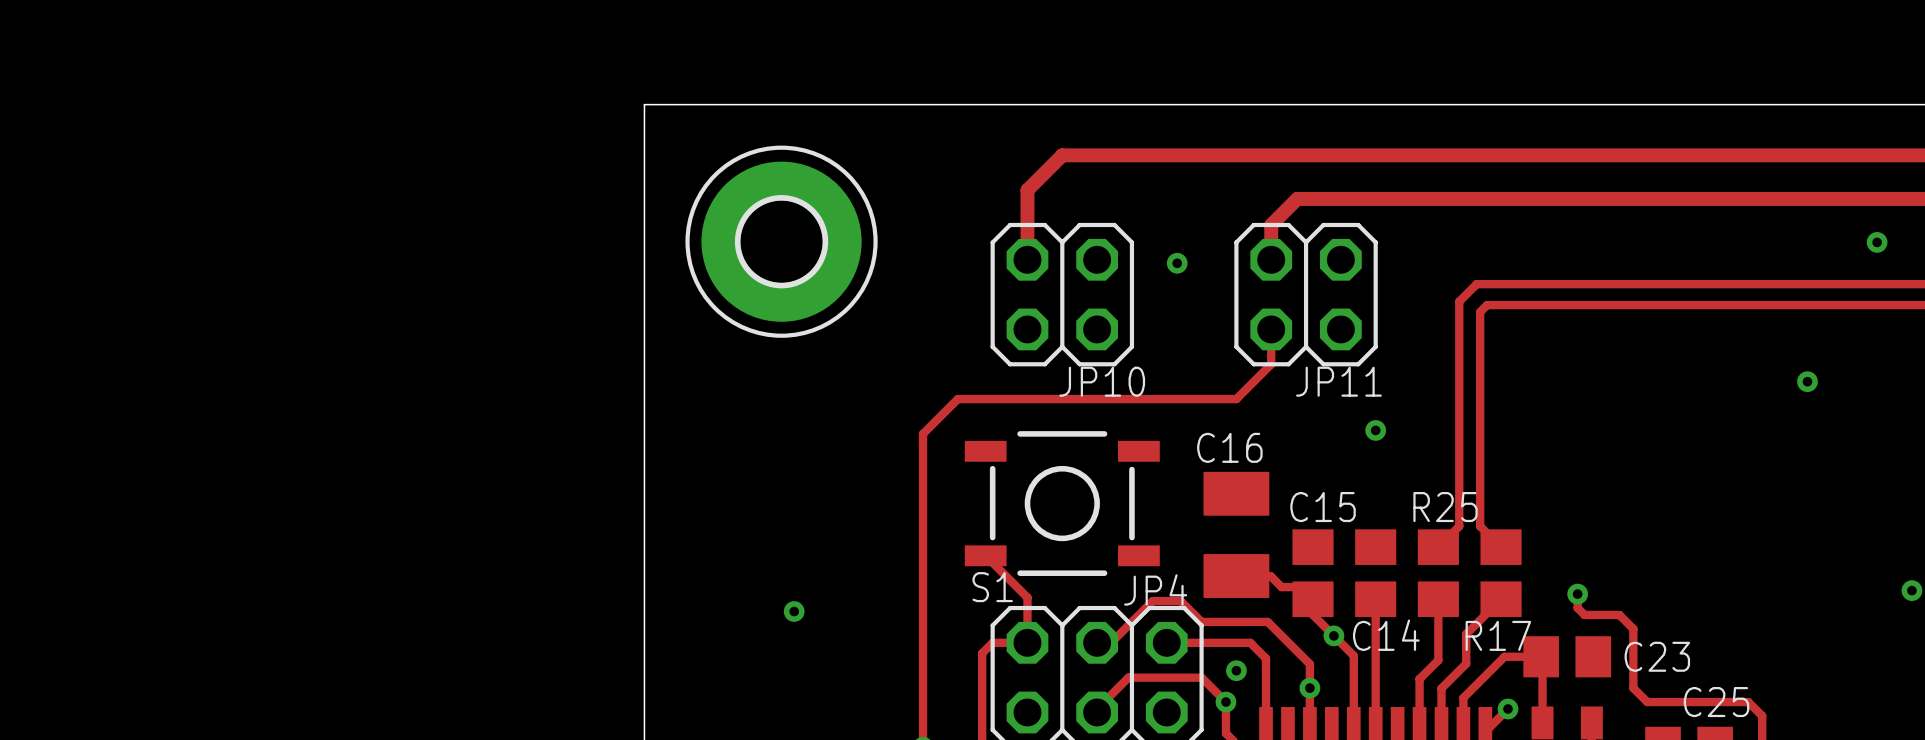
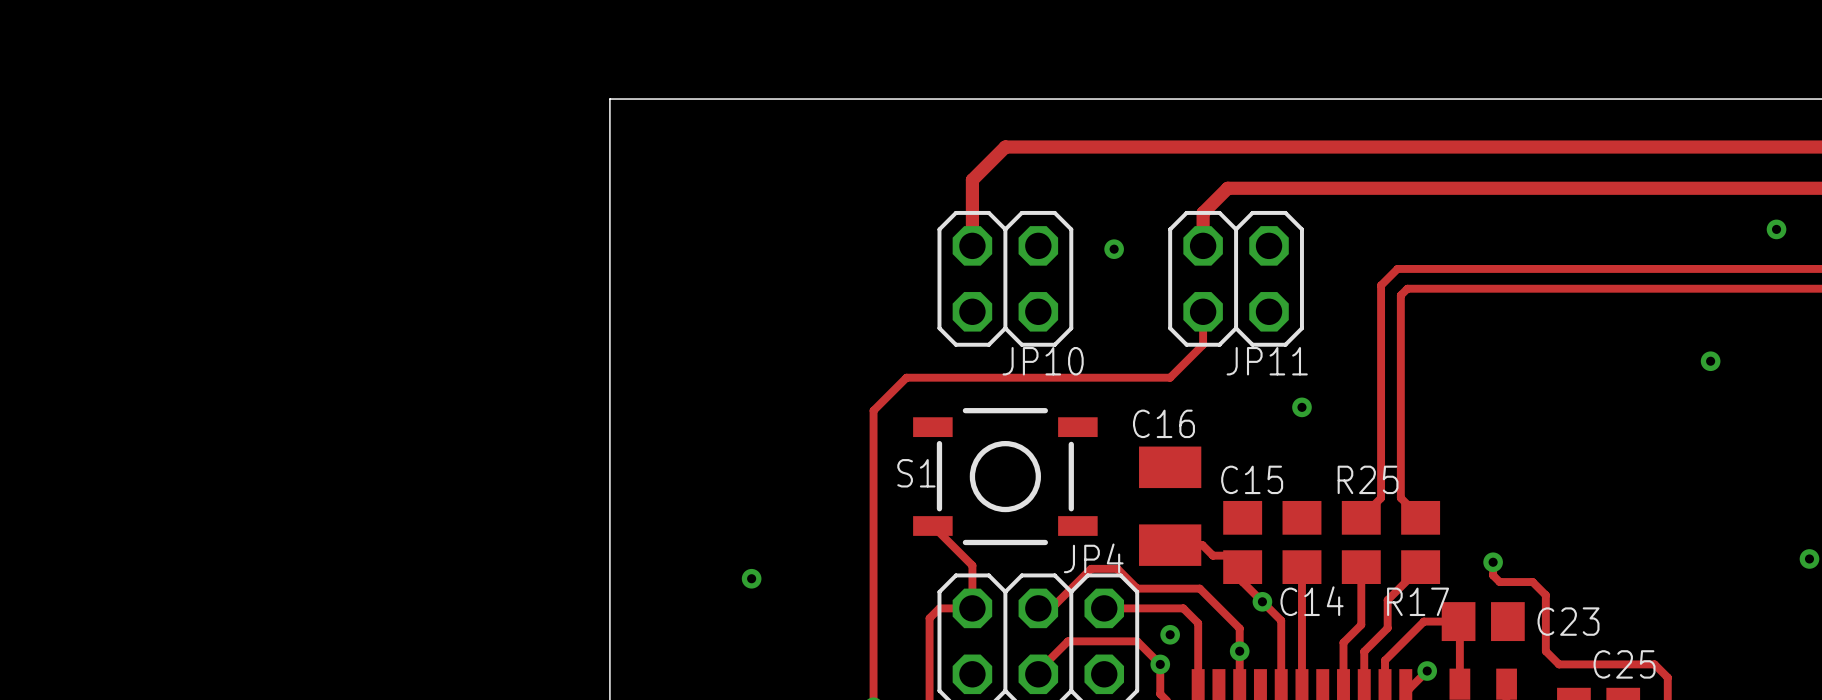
part: (781, 241) -> none
S1 name position: S1 (992, 587) -> S1 (916, 473)

